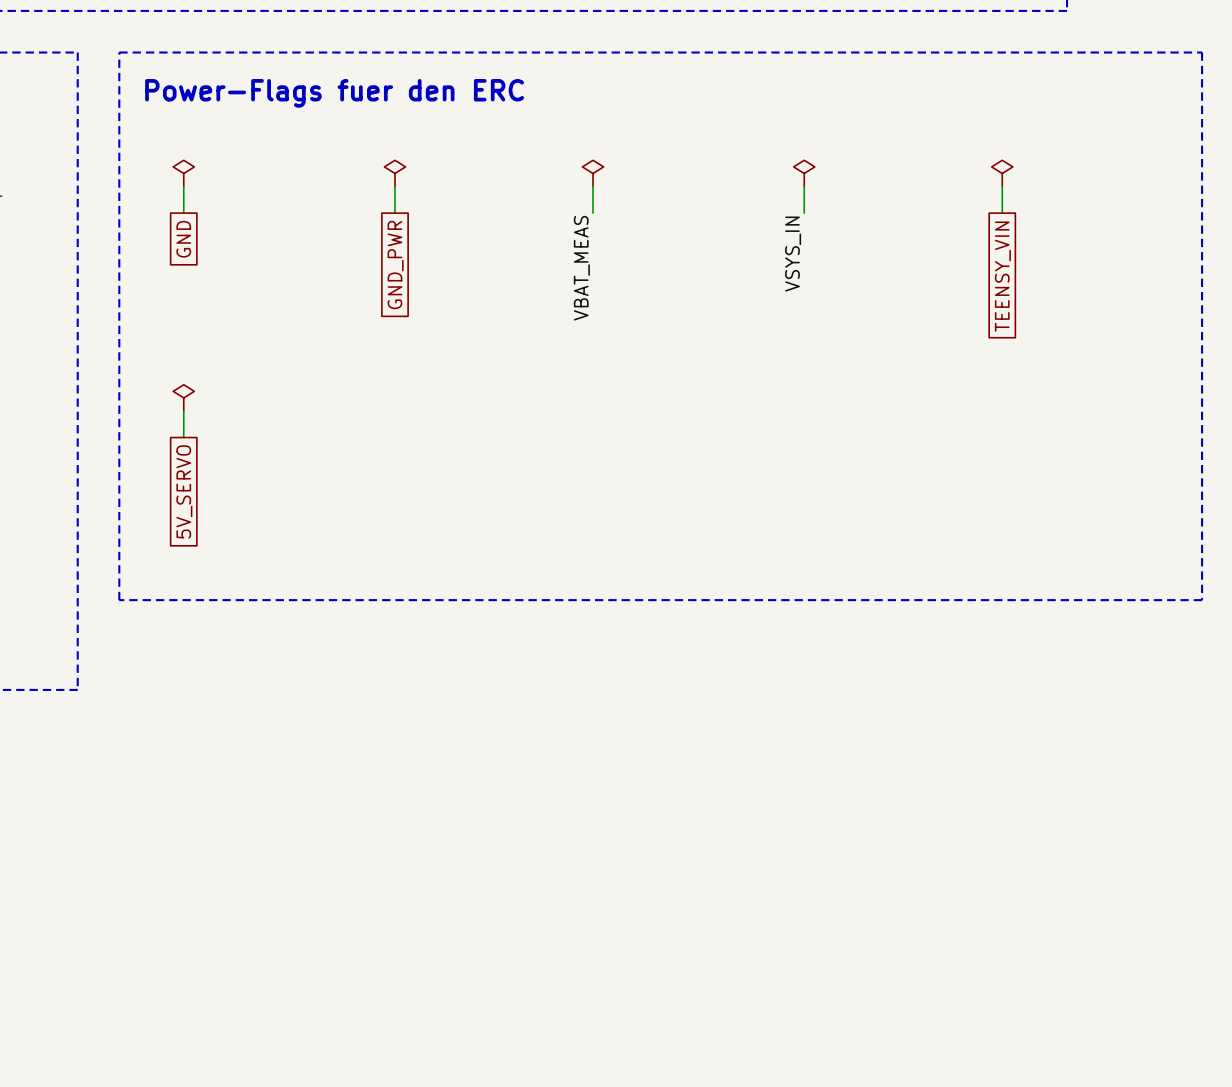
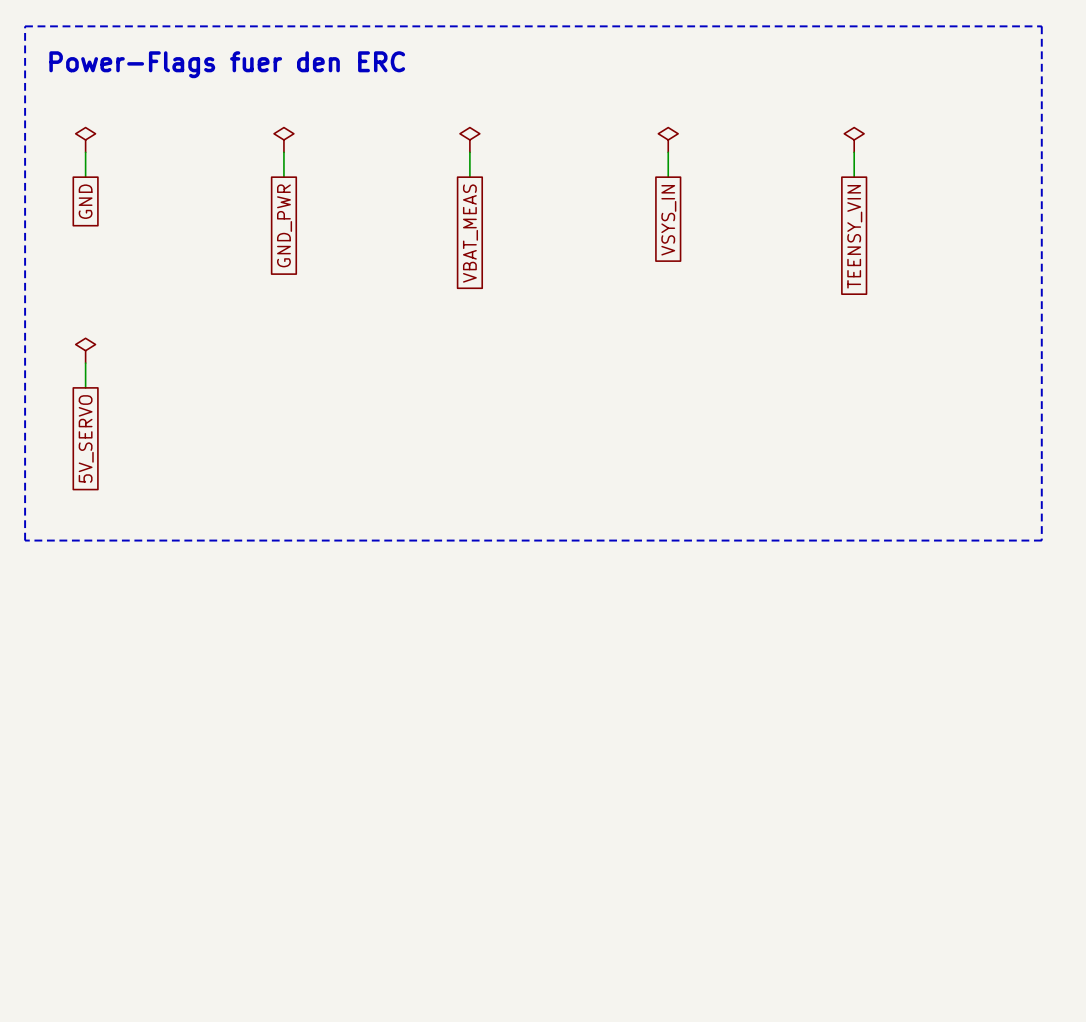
label: VSYS_IN (793, 254) -> none
global label: none -> VSYS_IN (668, 220)
label: VBAT_MEAS (581, 268) -> none
global label: none -> VBAT_MEAS (470, 233)

